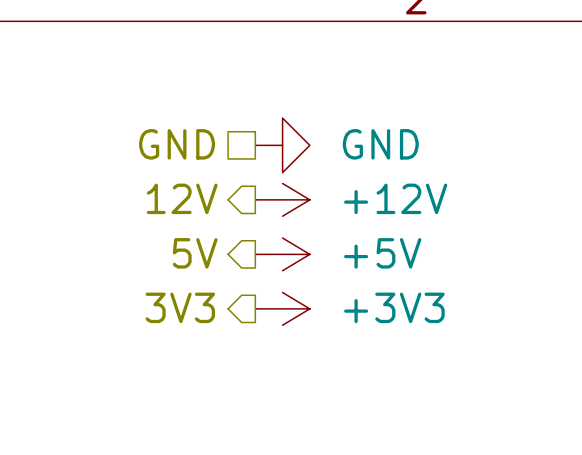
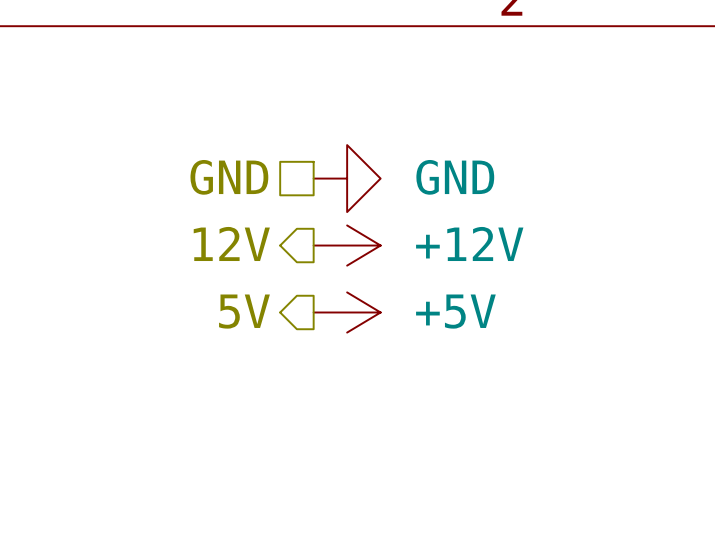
hierarchical label: 3V3 (180, 307) -> none
power symbol: +3V3 (282, 308) -> none

